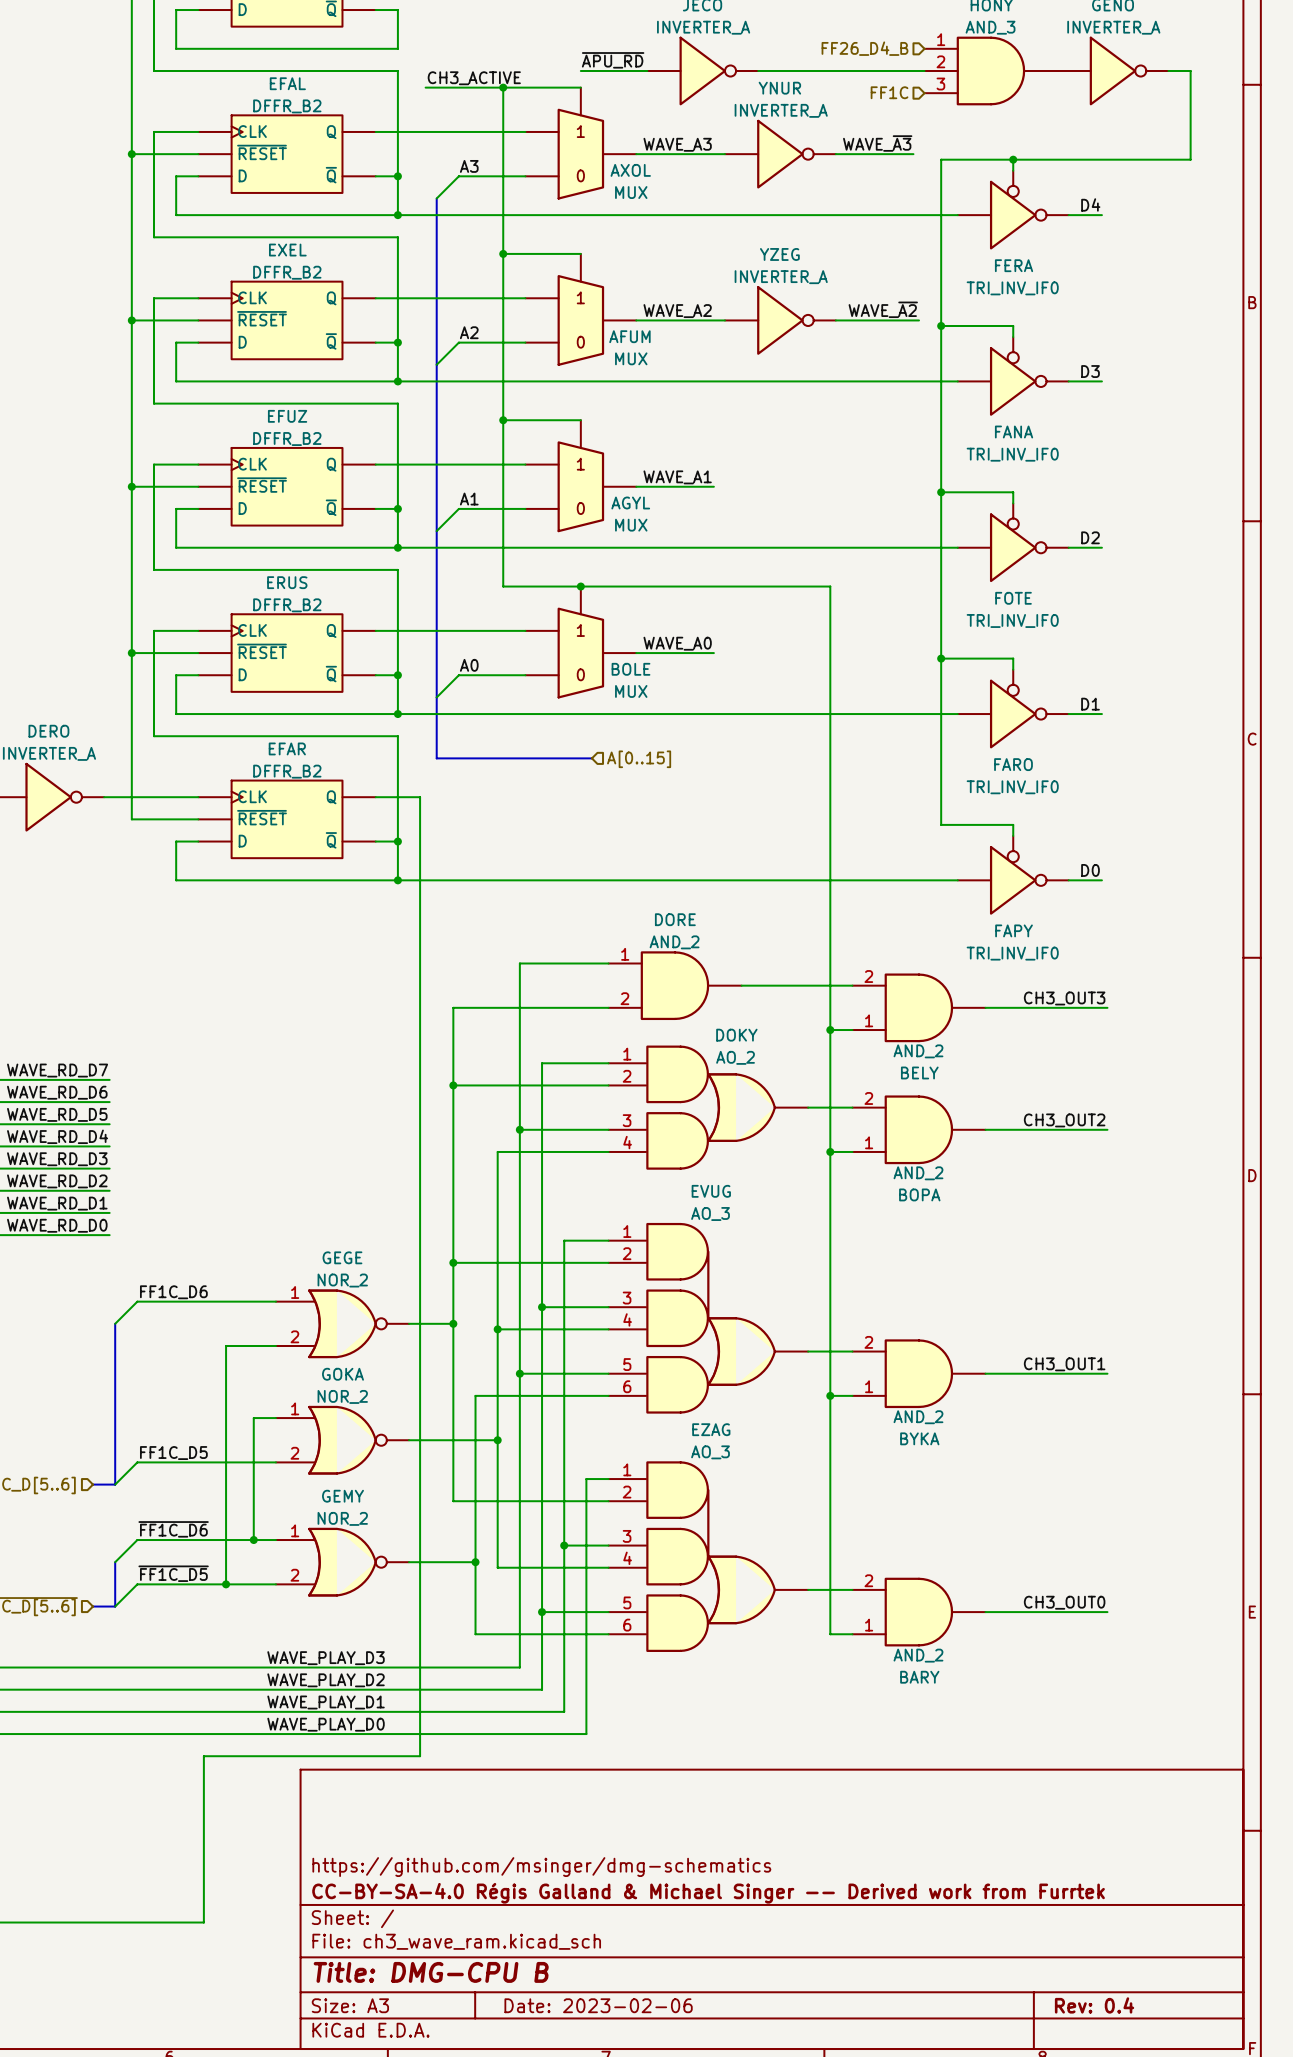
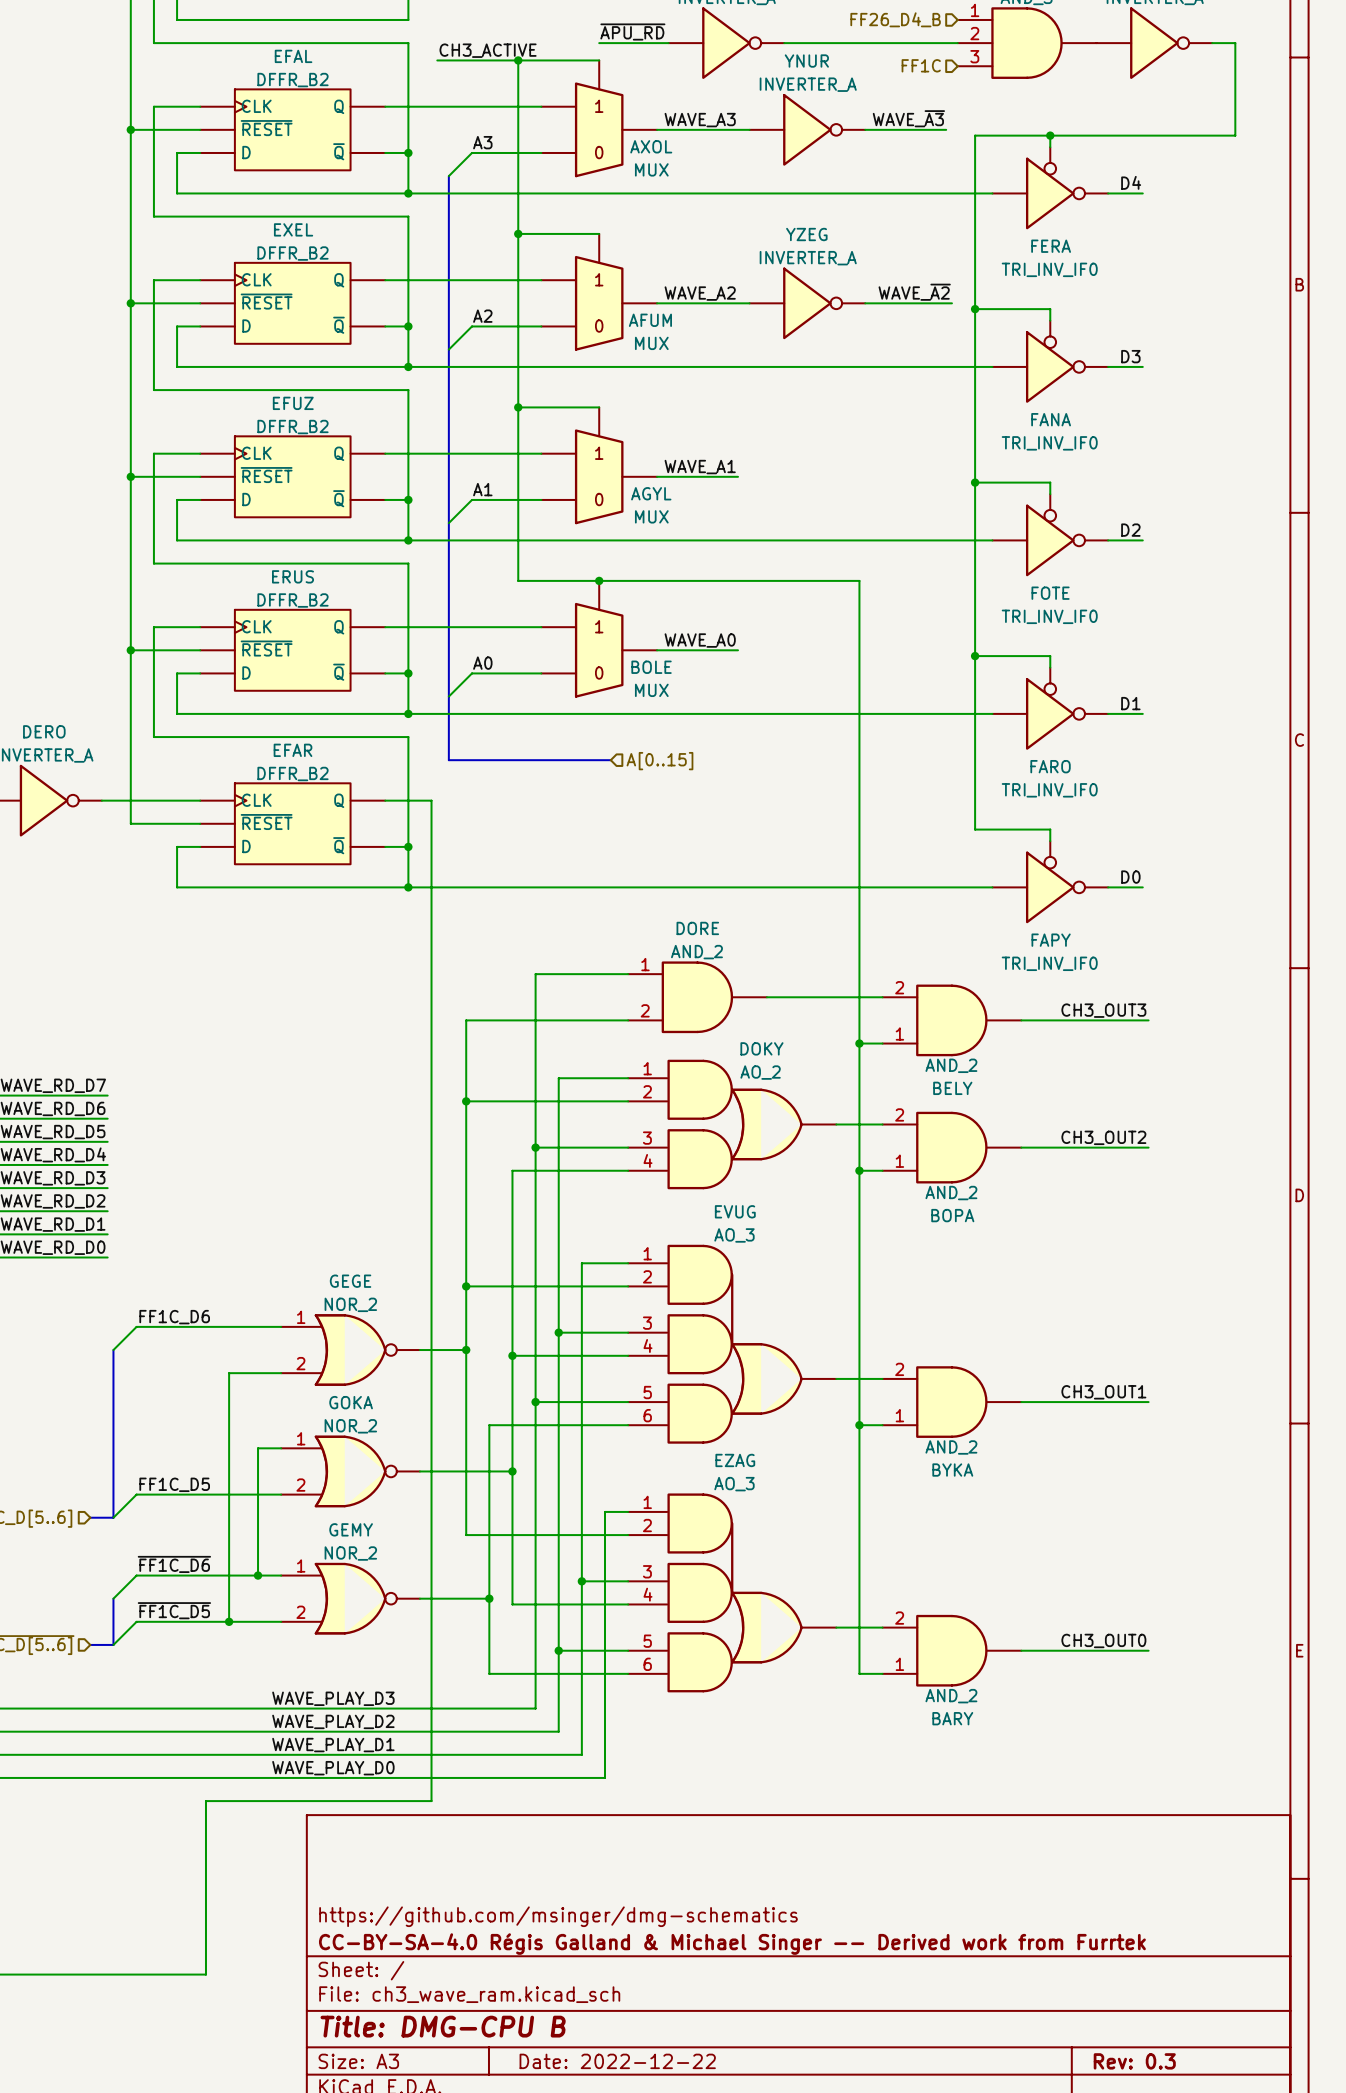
title block: Date: 2023-02-06 (598, 2005) -> Date: 2022-12-22 (617, 2061)
title block: Rev: 0.4 (1094, 2005) -> Rev: 0.3 (1134, 2061)

